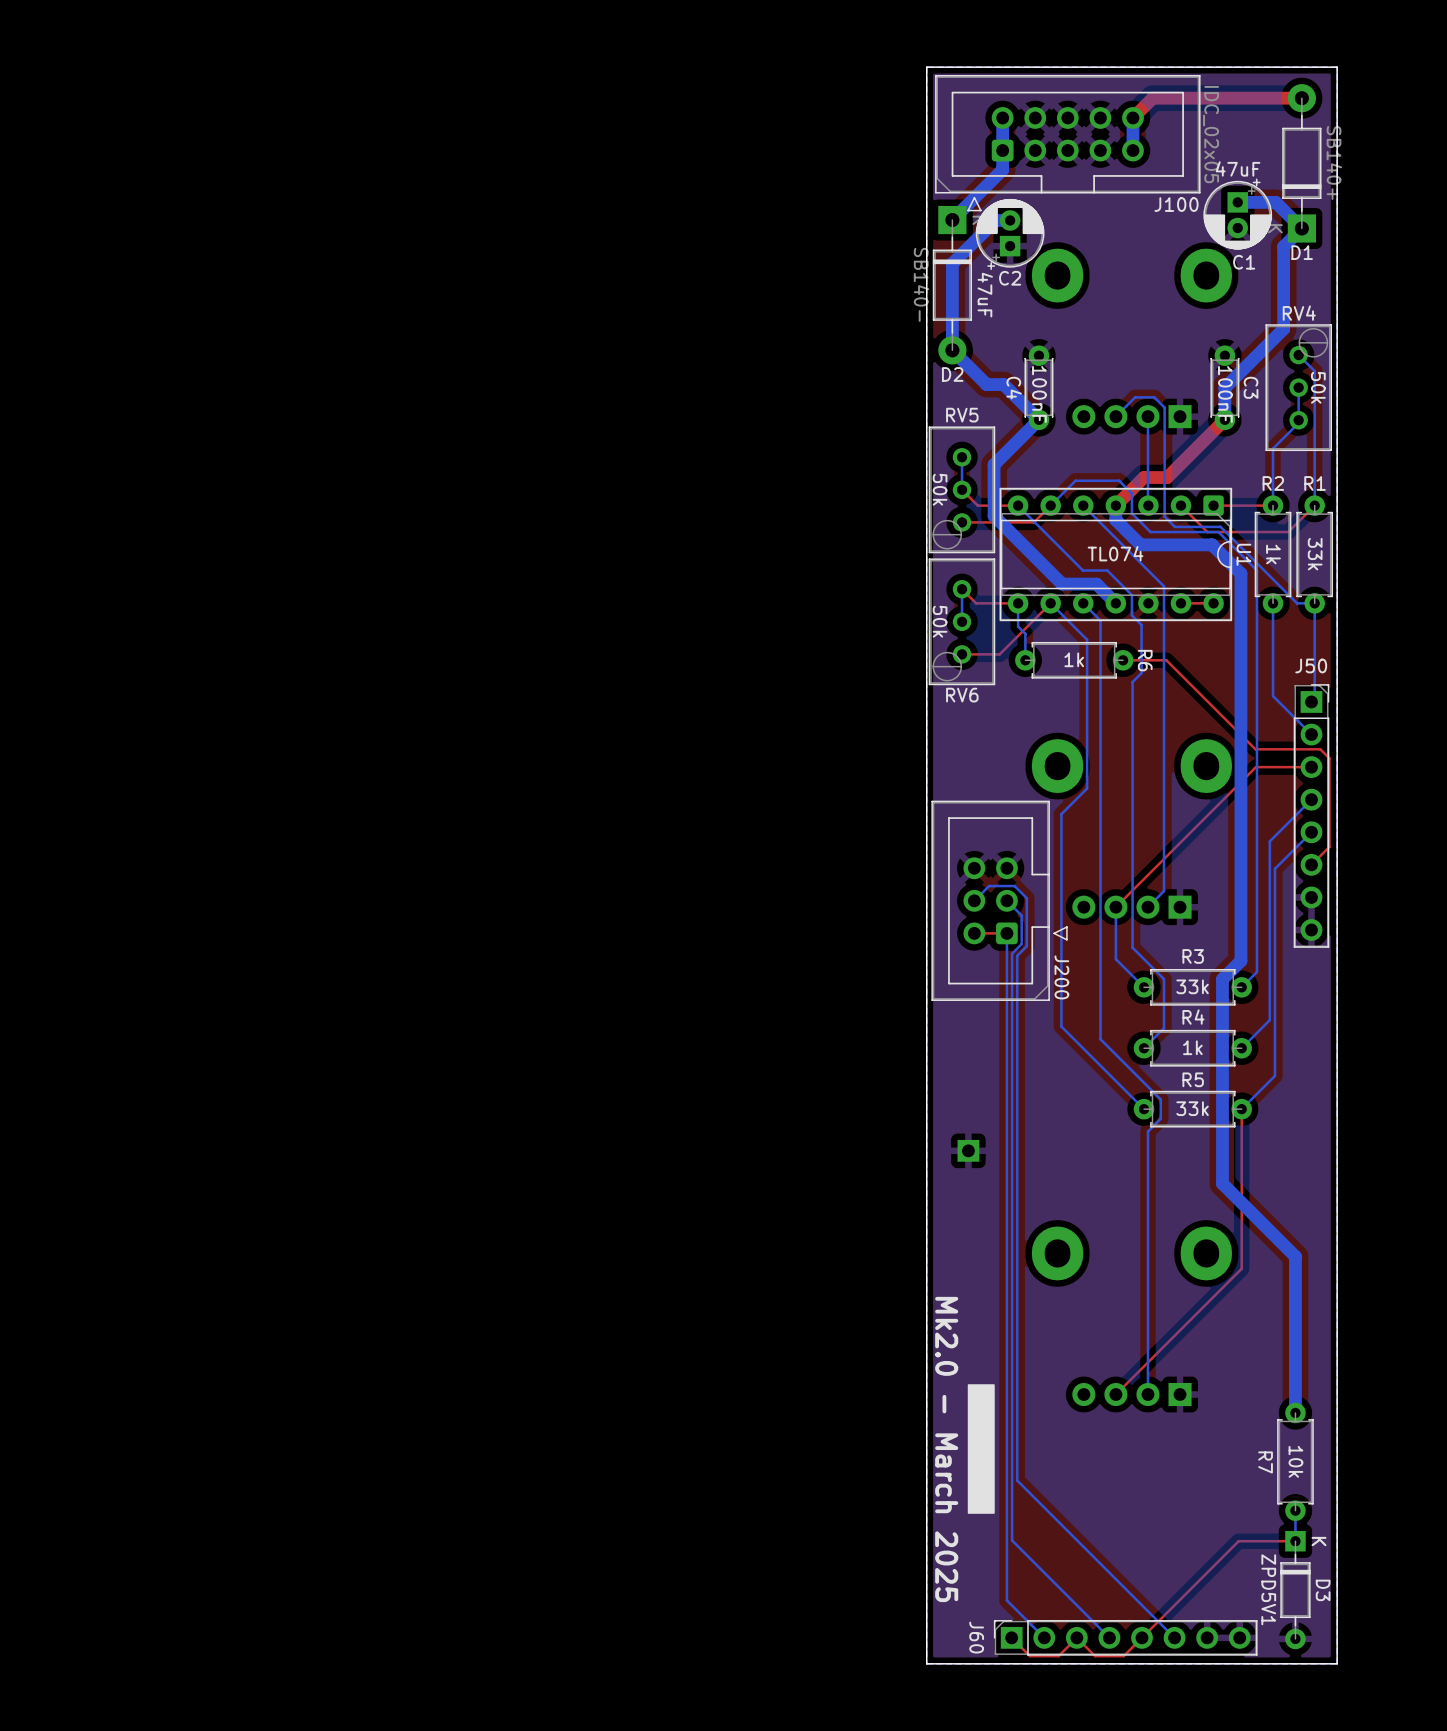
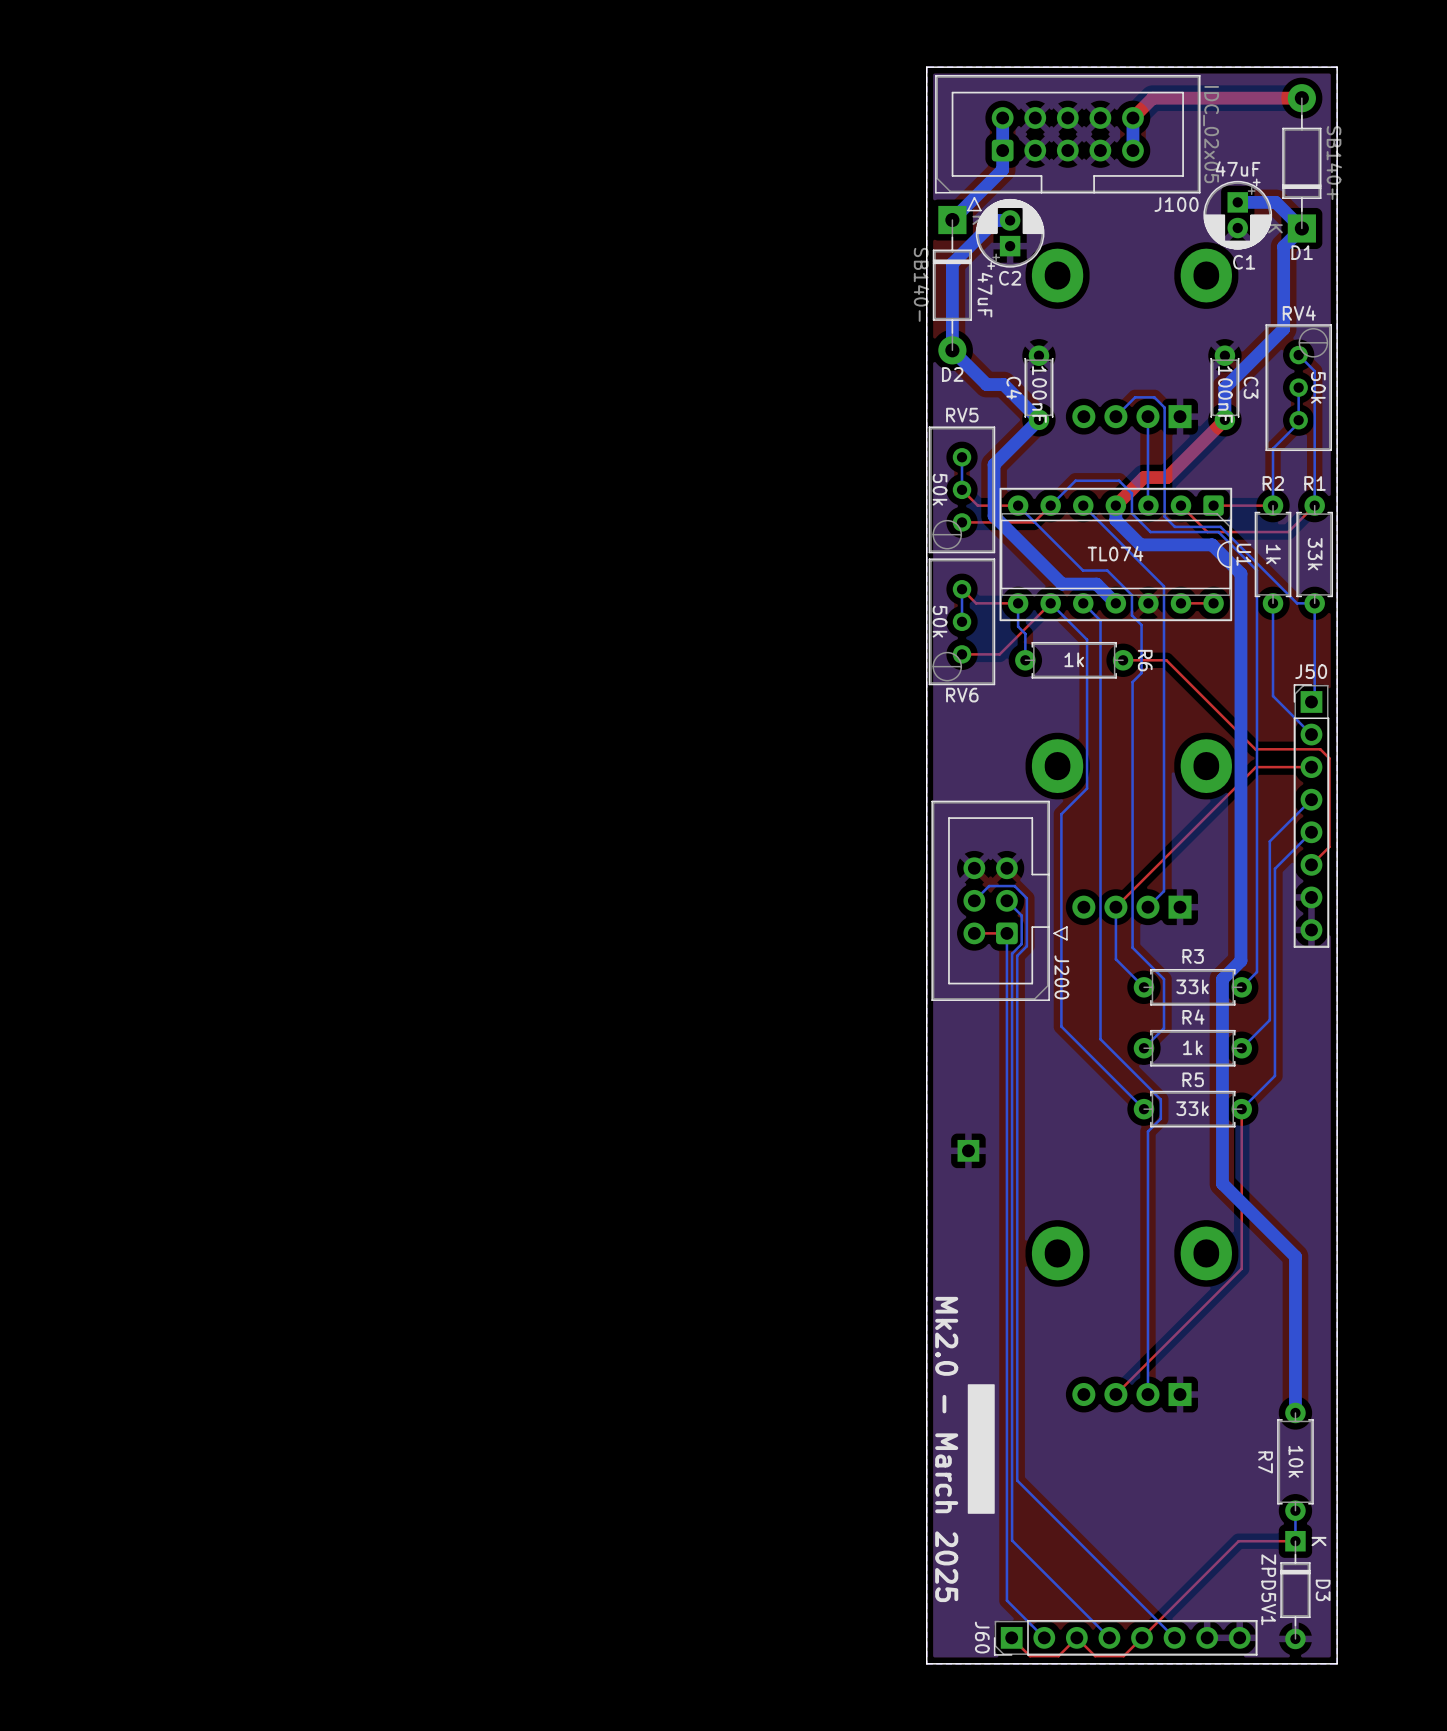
J50 footprint: [1293, 684, 1330, 948] -> [1293, 684, 1330, 948]
J60 footprint: [993, 1620, 1258, 1656] -> [993, 1620, 1258, 1656]

